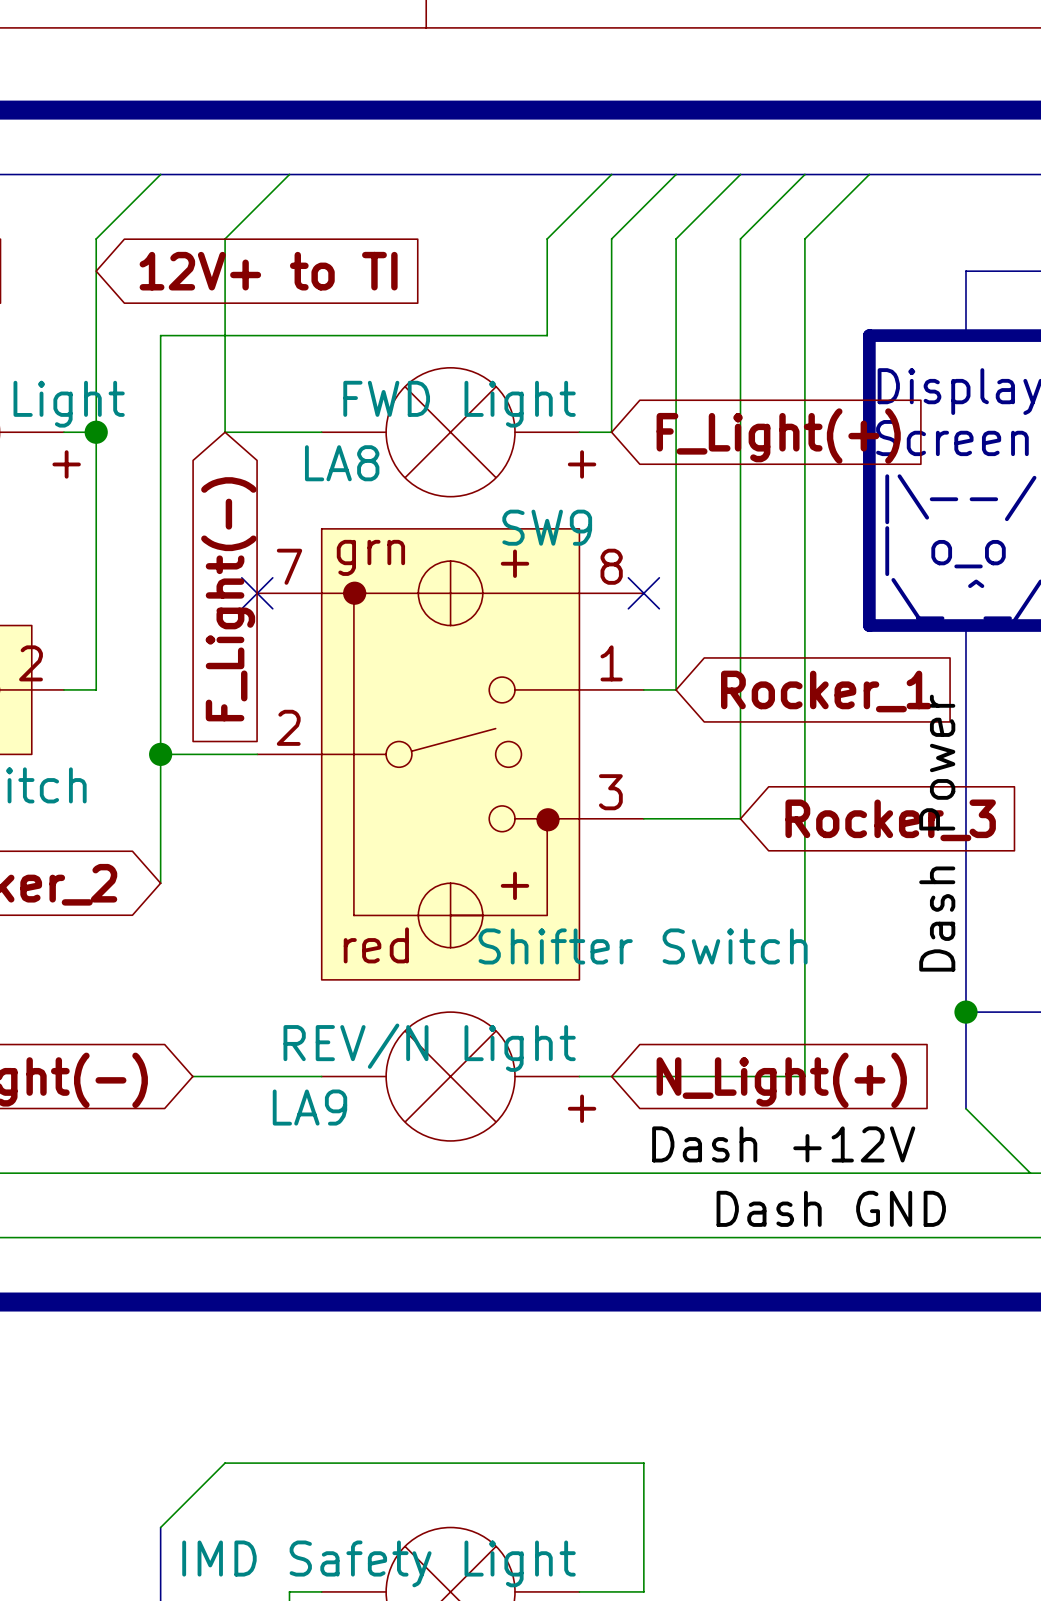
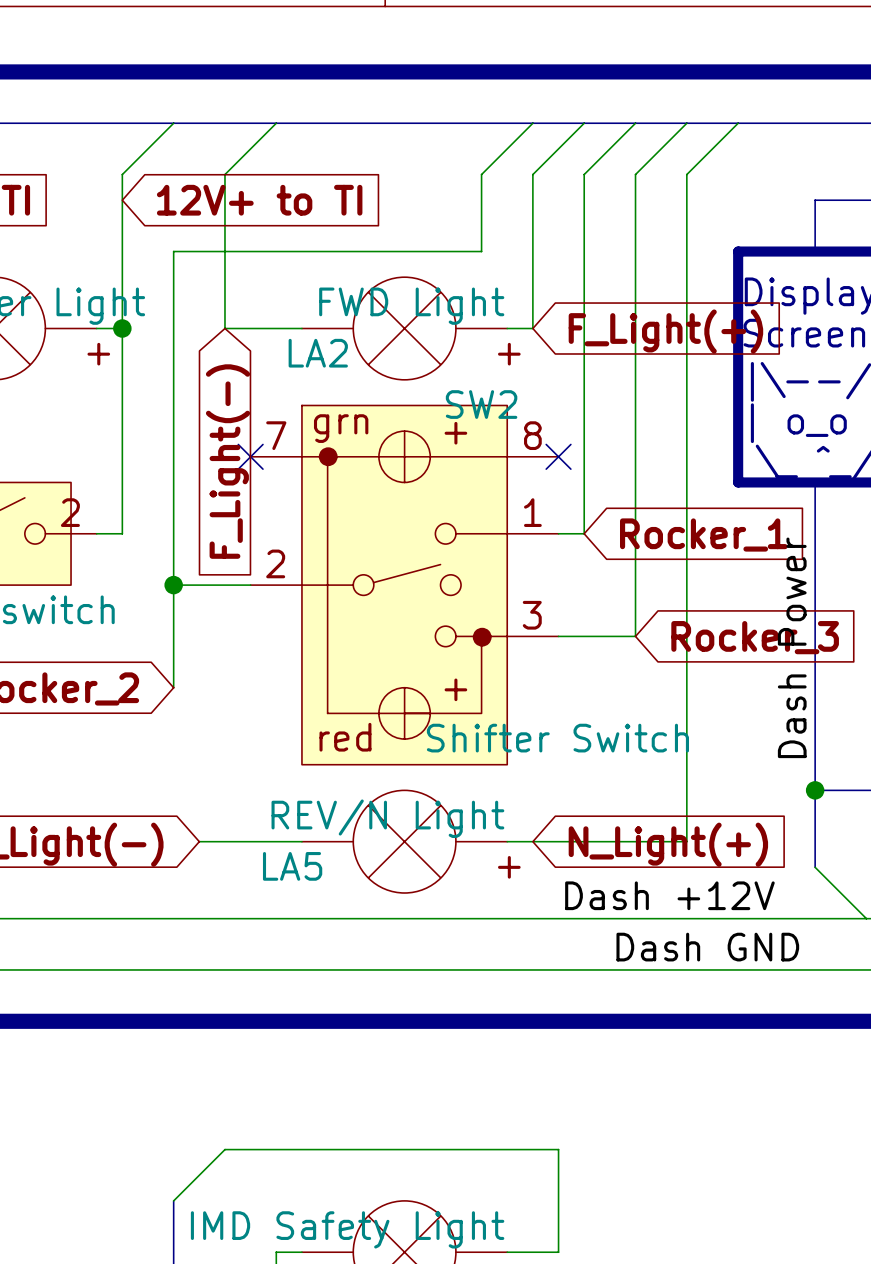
LA8 name: LA8 (342, 463) -> LA2 (318, 353)
SW9 name: SW9 (547, 527) -> SW2 (481, 404)
LA9 name: LA9 (309, 1107) -> LA5 (292, 866)

